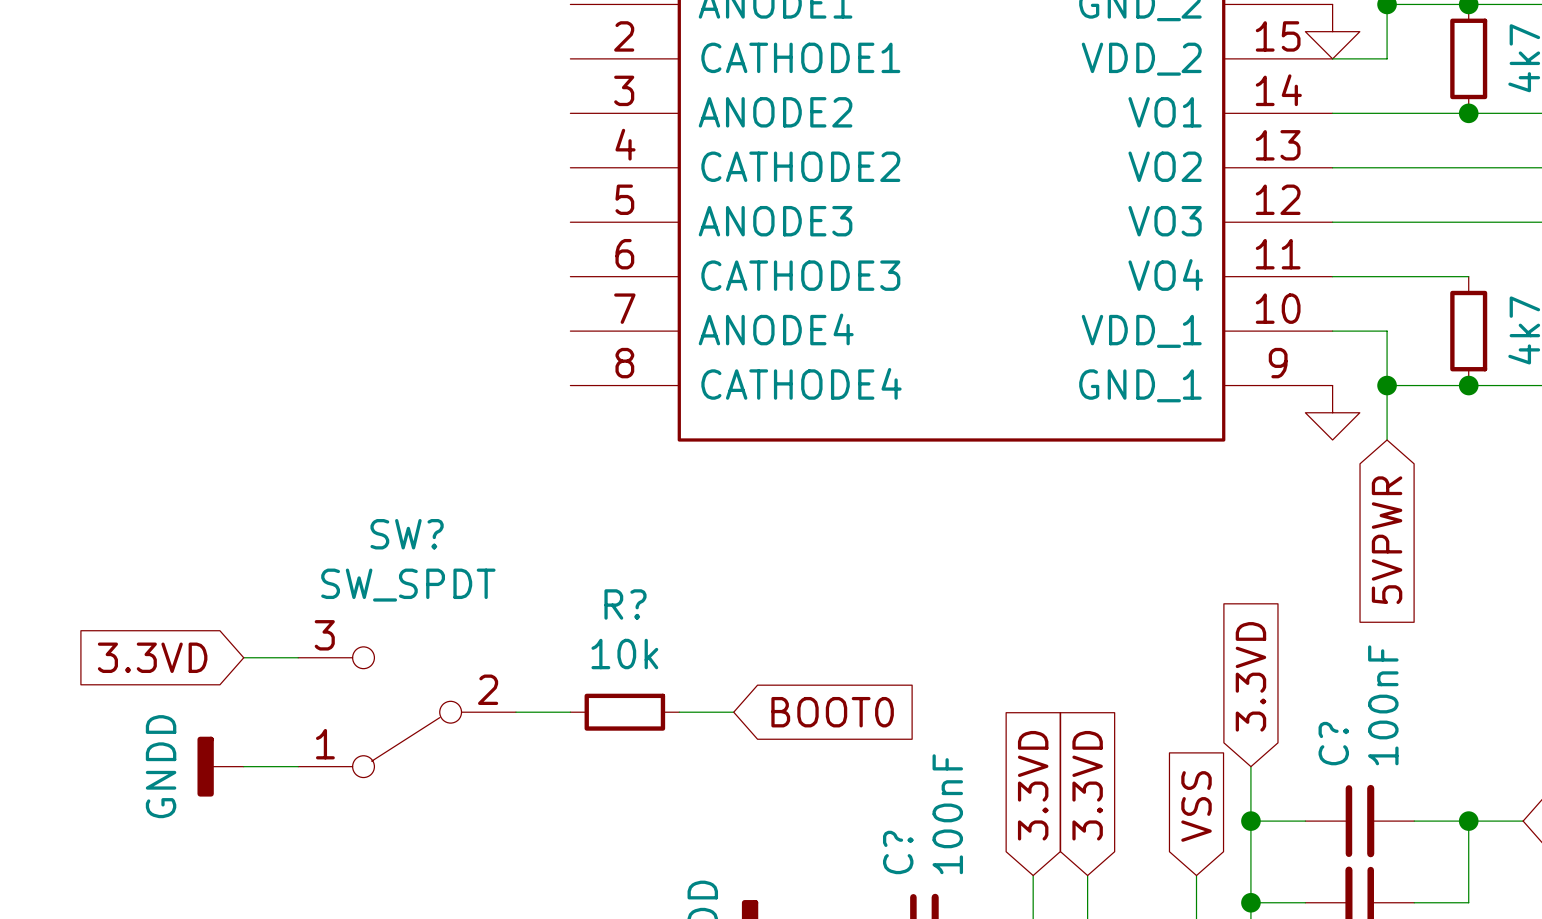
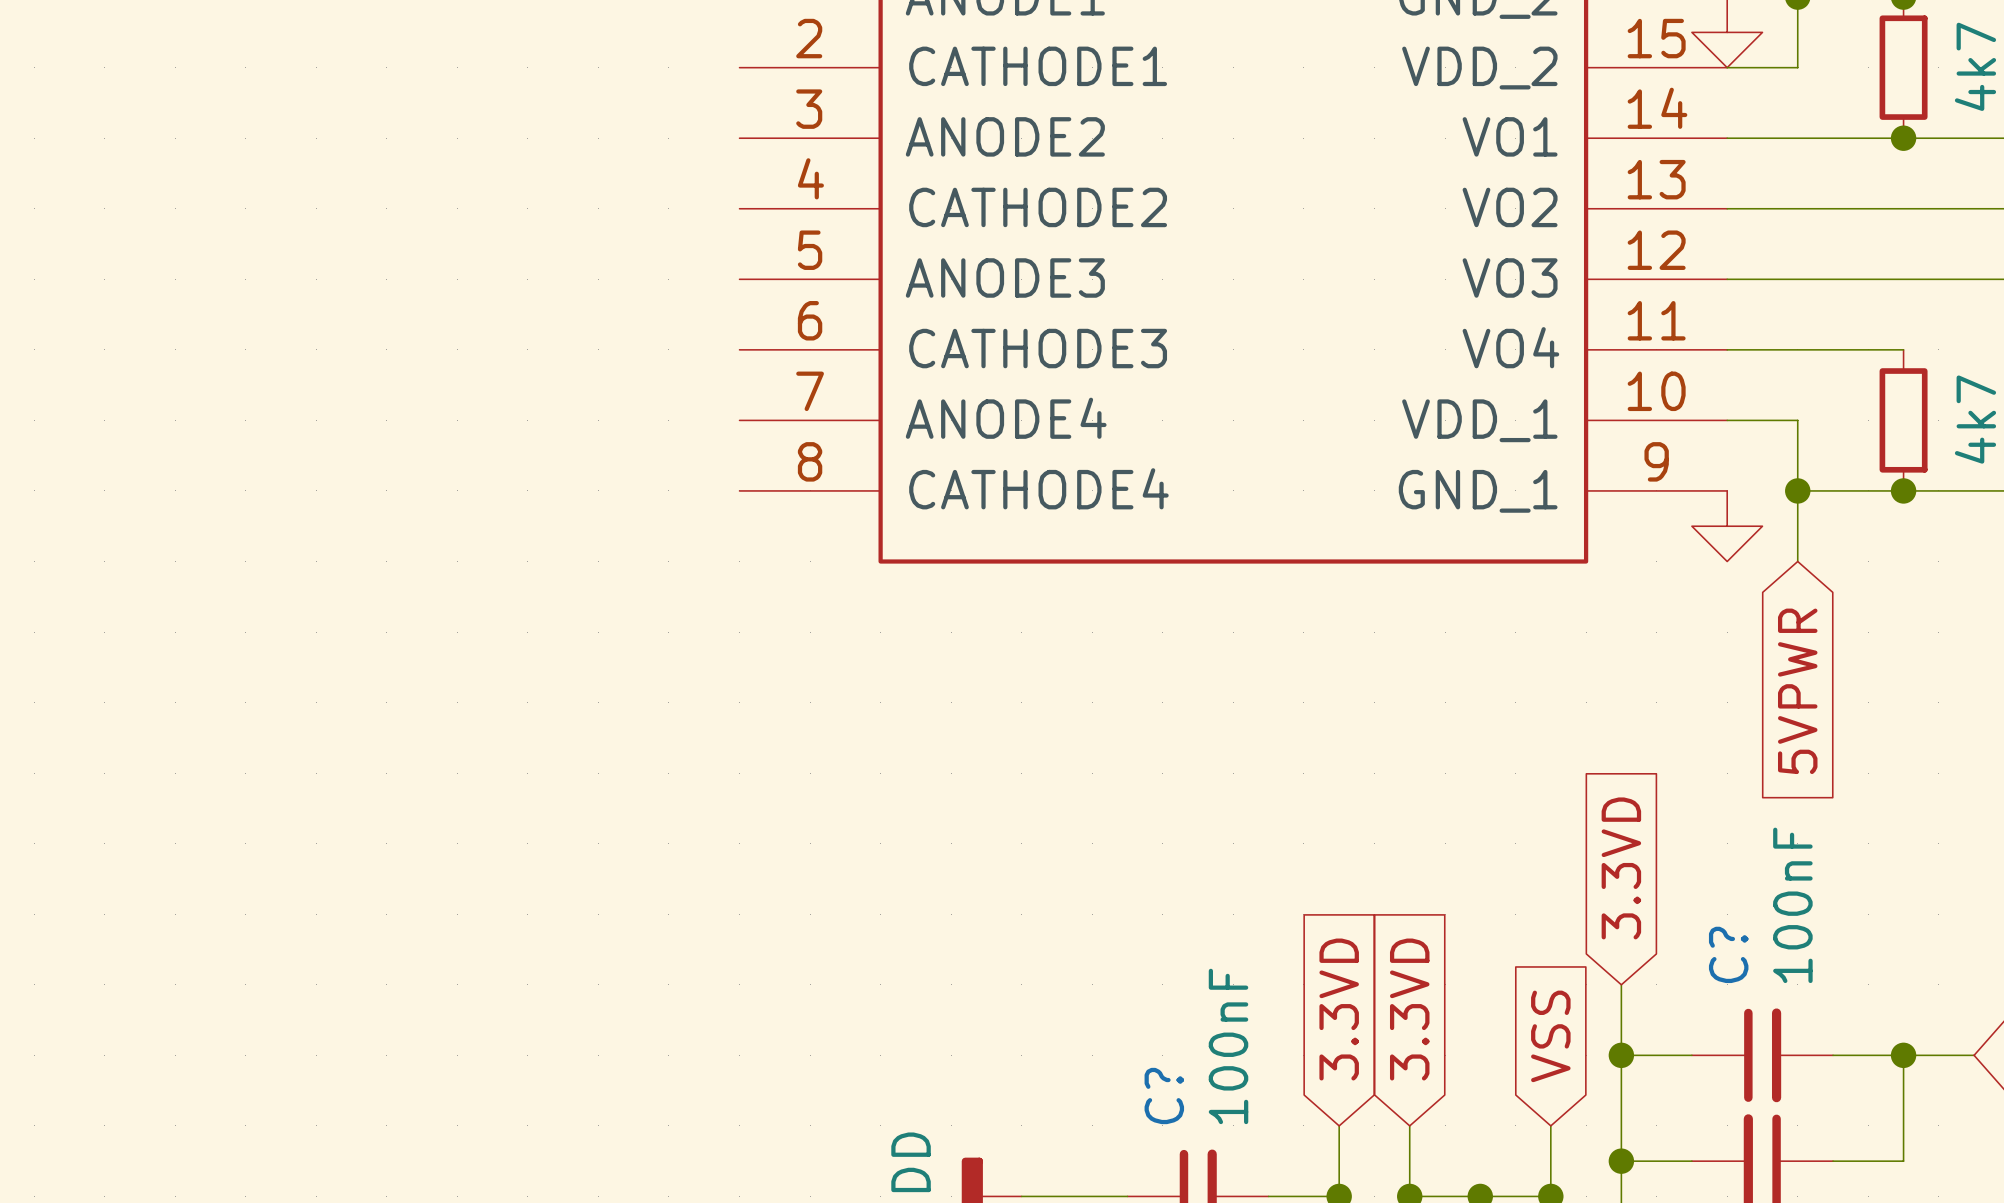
global label: 3.3VD (152, 657) -> none
wire: (243, 657) (298, 657) -> none
SW?: SW_SPDT (407, 712) -> none
wire: (515, 712) (570, 712) -> none
R?: 10k (624, 712) -> none
wire: (679, 712) (733, 712) -> none
global label: BOOT0 (832, 712) -> none
power symbol: GNDD (220, 766) -> none
wire: (243, 766) (298, 766) -> none

